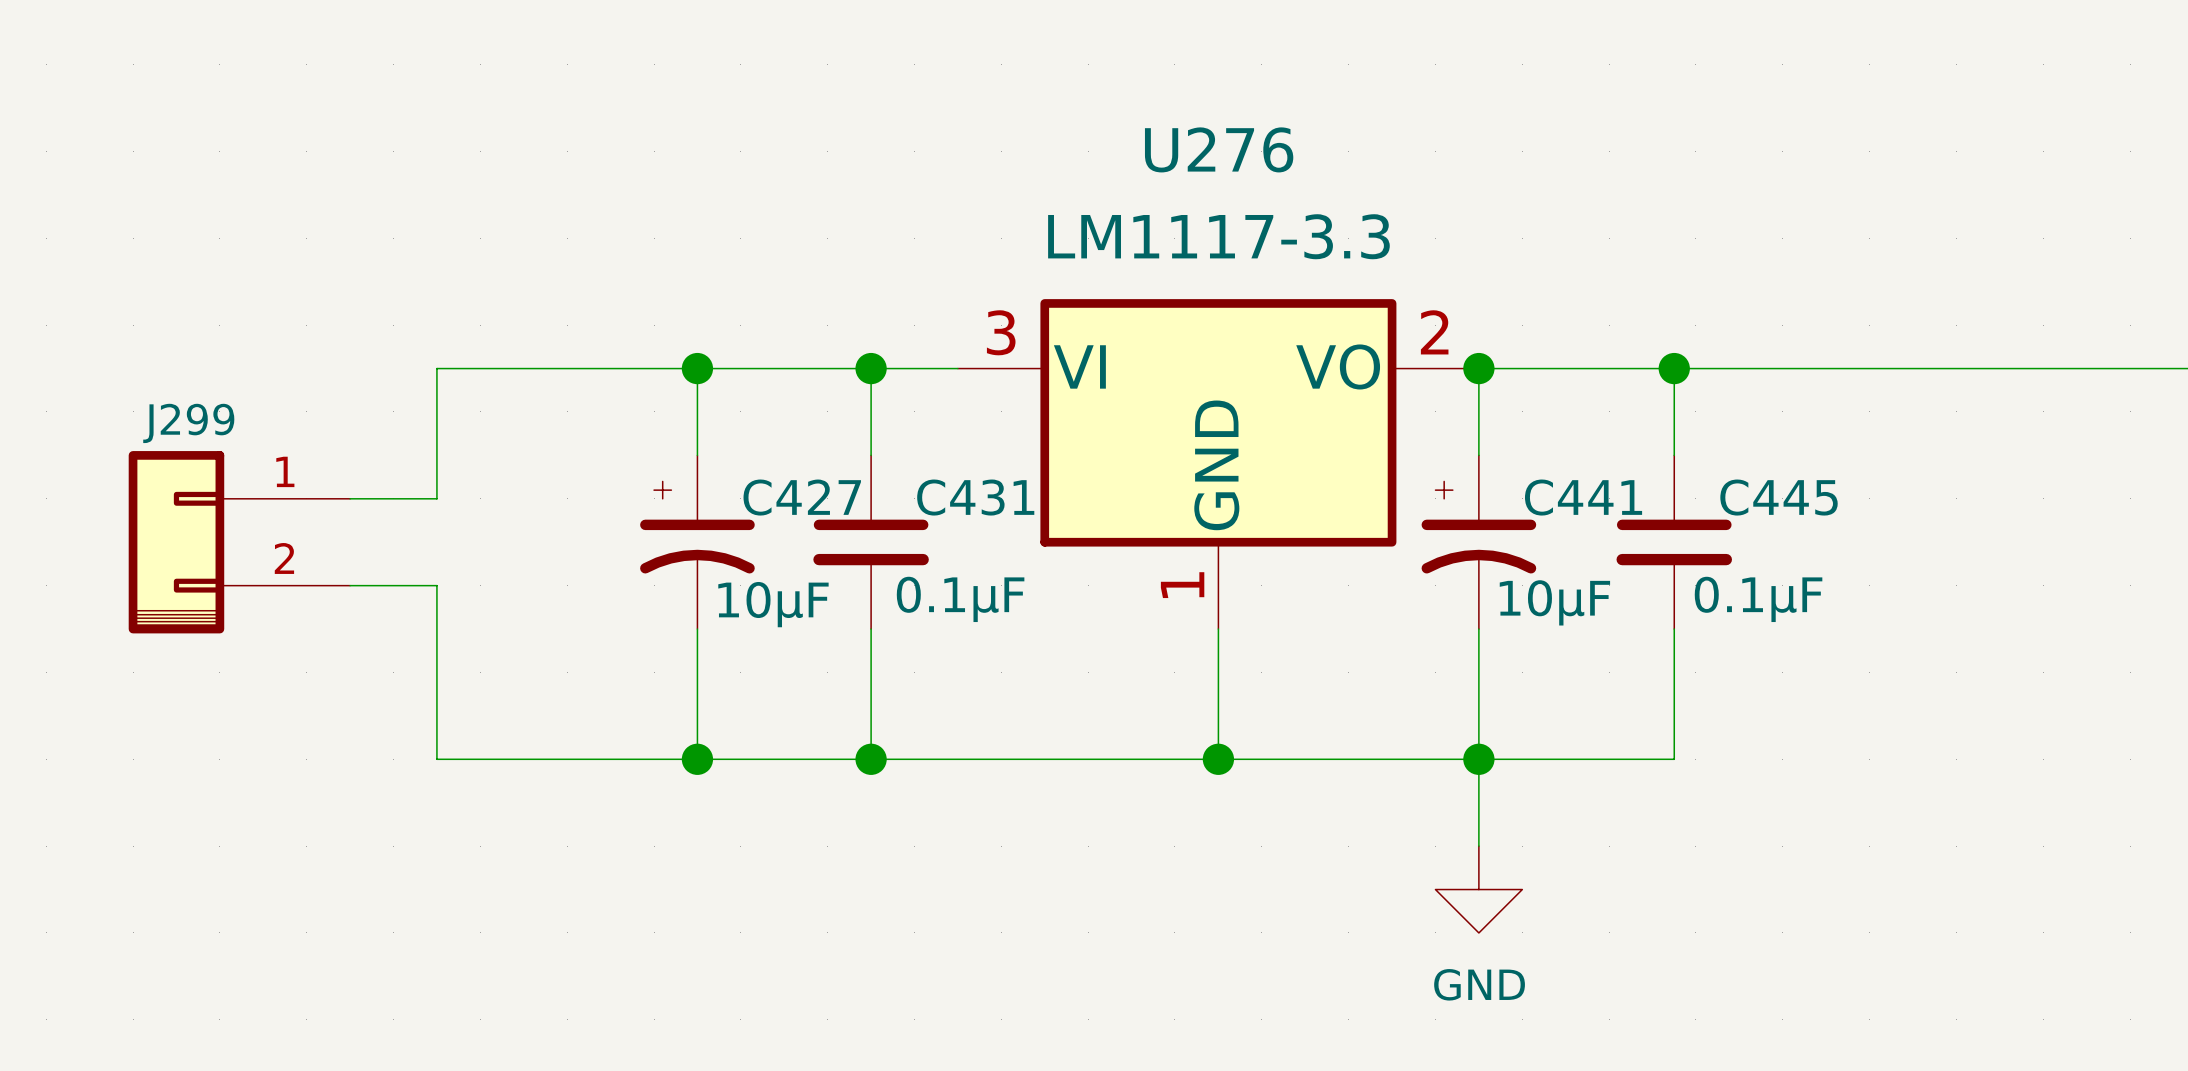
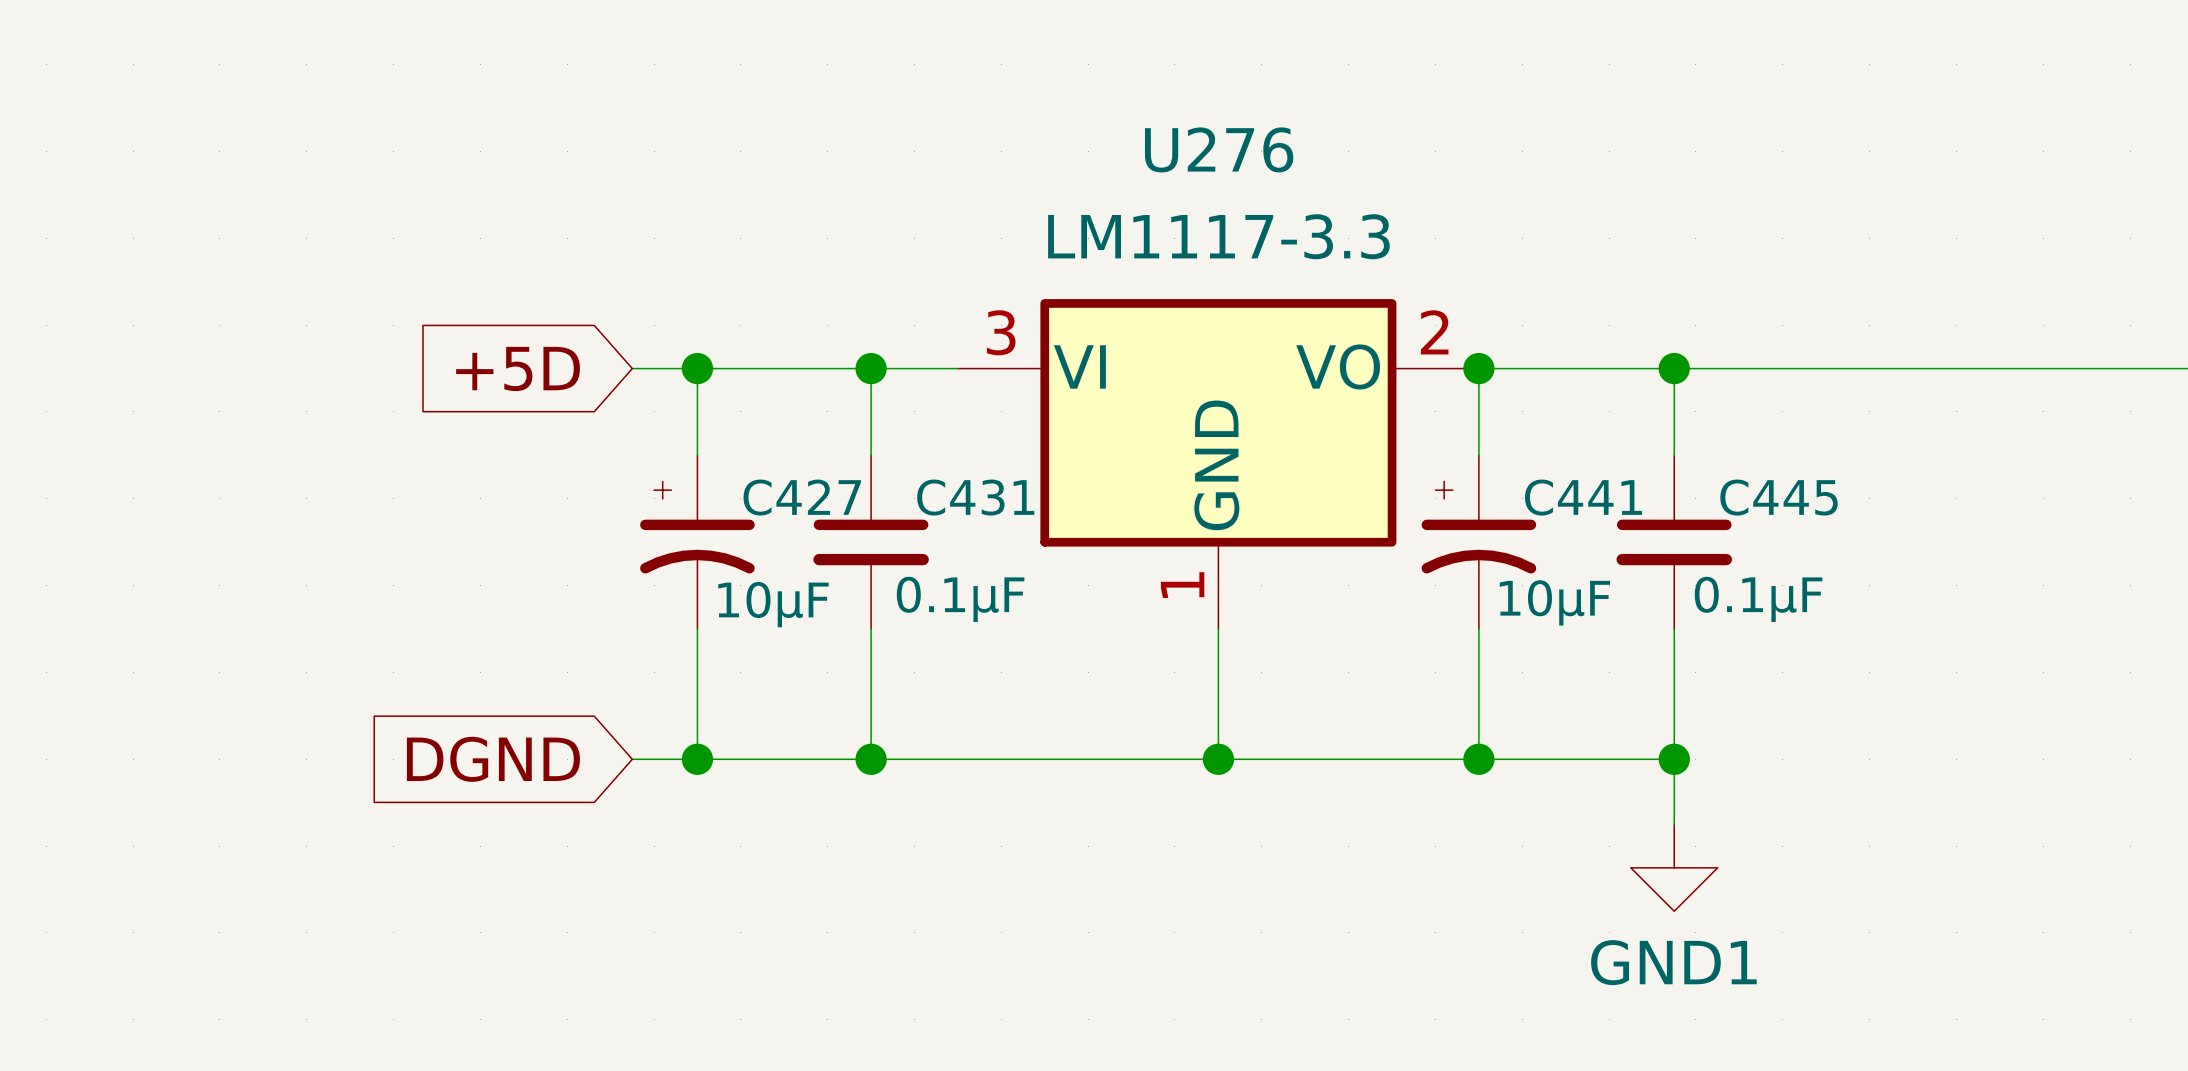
global label: none -> +5D (518, 368)
wire: (632, 368) (436, 368) (436, 498) (350, 498) -> none
J299: (239, 542) -> none
wire: (350, 585) (436, 585) (436, 759) (632, 759) -> none
global label: none -> DGND (493, 759)
wire: (1478, 759) (1478, 846) -> none
wire: none -> (1674, 759) (1674, 824)
junction: none -> (1674, 759)
power symbol: none -> GND1 (1674, 867)
power symbol: GND (1478, 889) -> none

